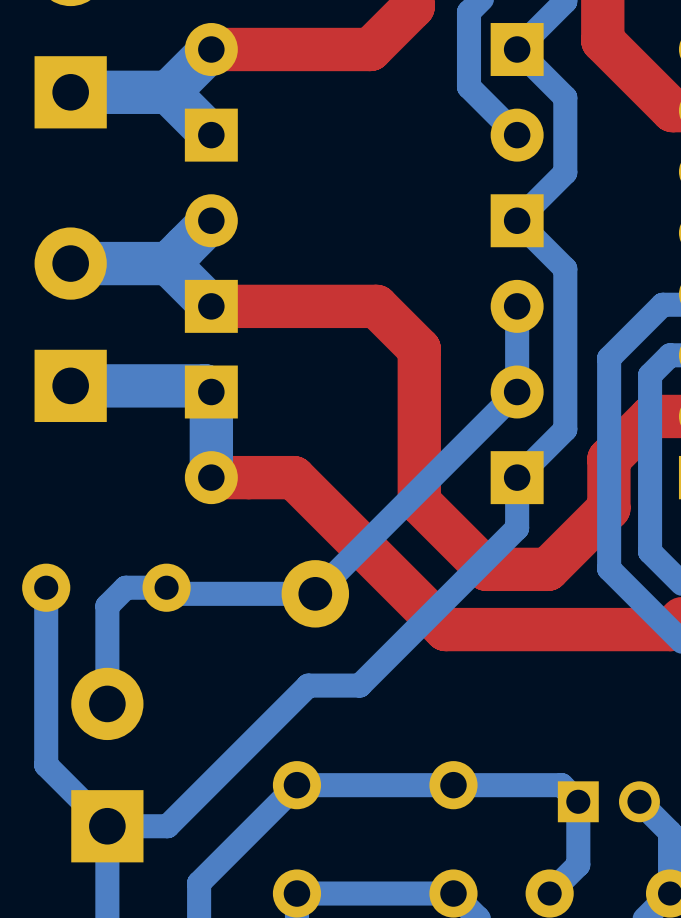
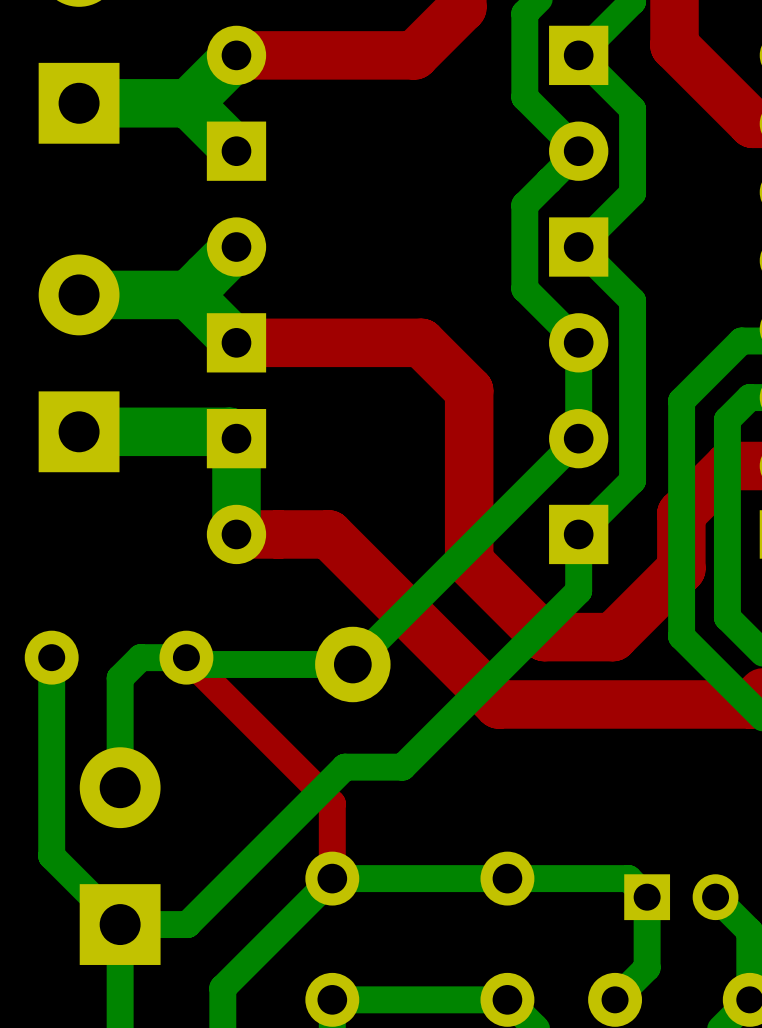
bottom track: none -> (578, 151) (524, 205) (524, 288) (578, 342)
top track: none -> (186, 657) (332, 803) (332, 878)

